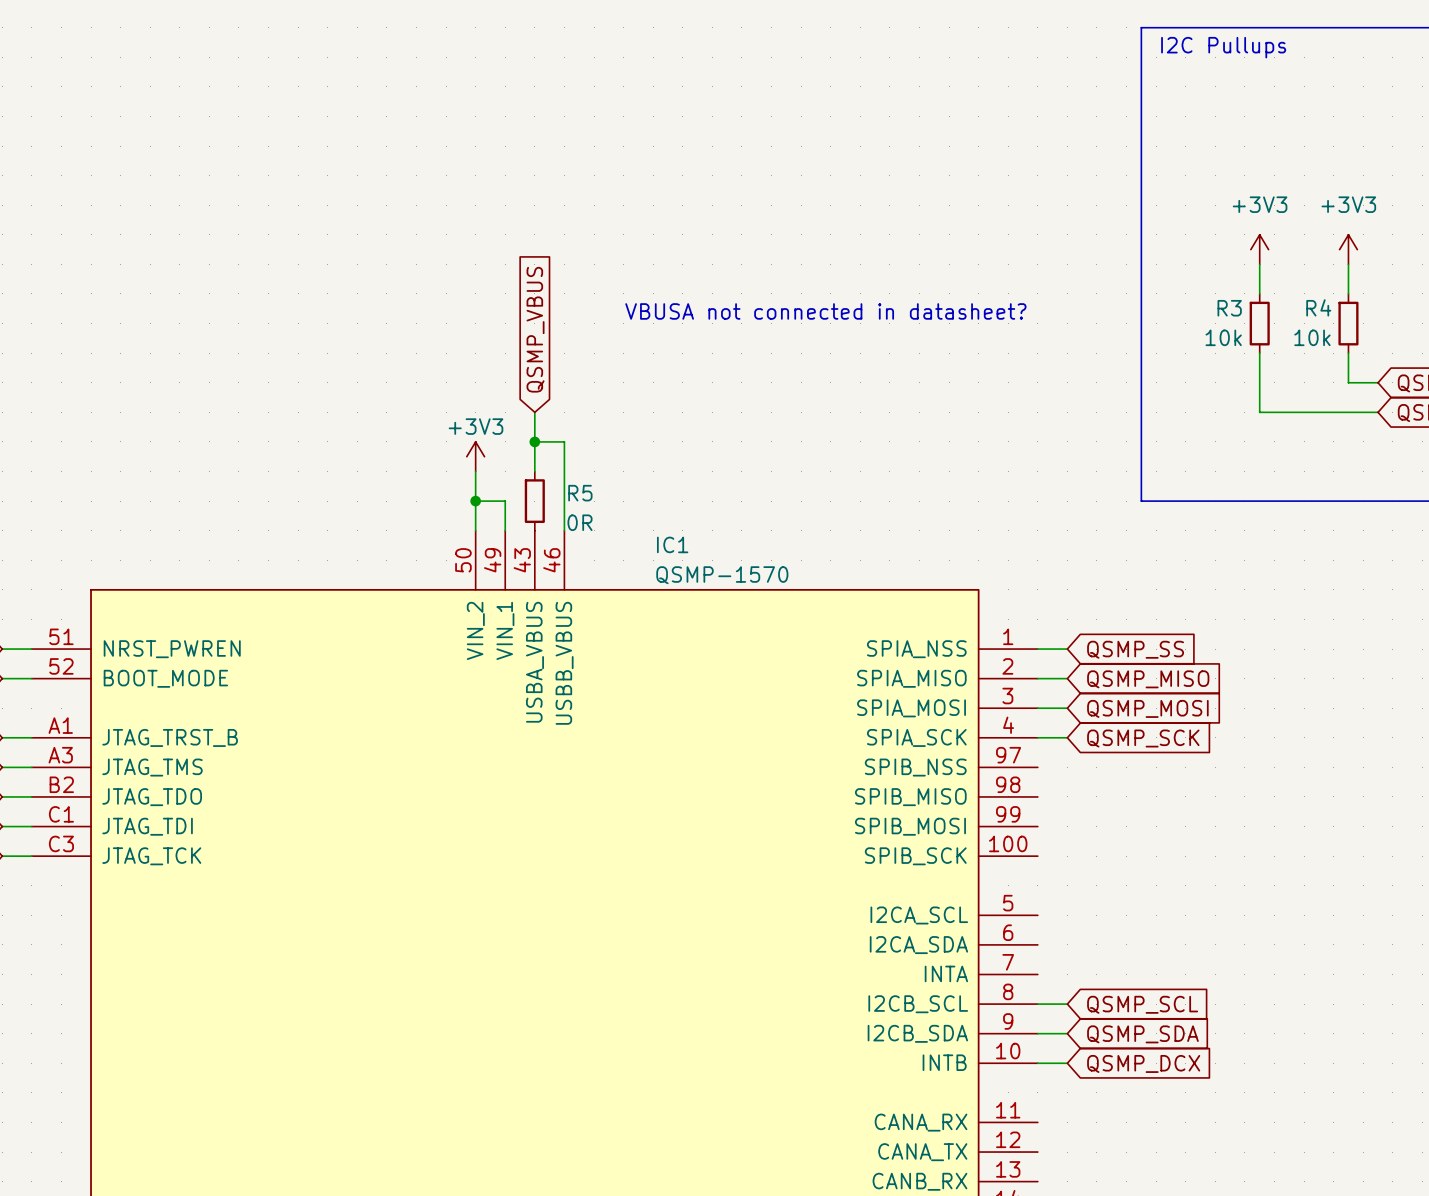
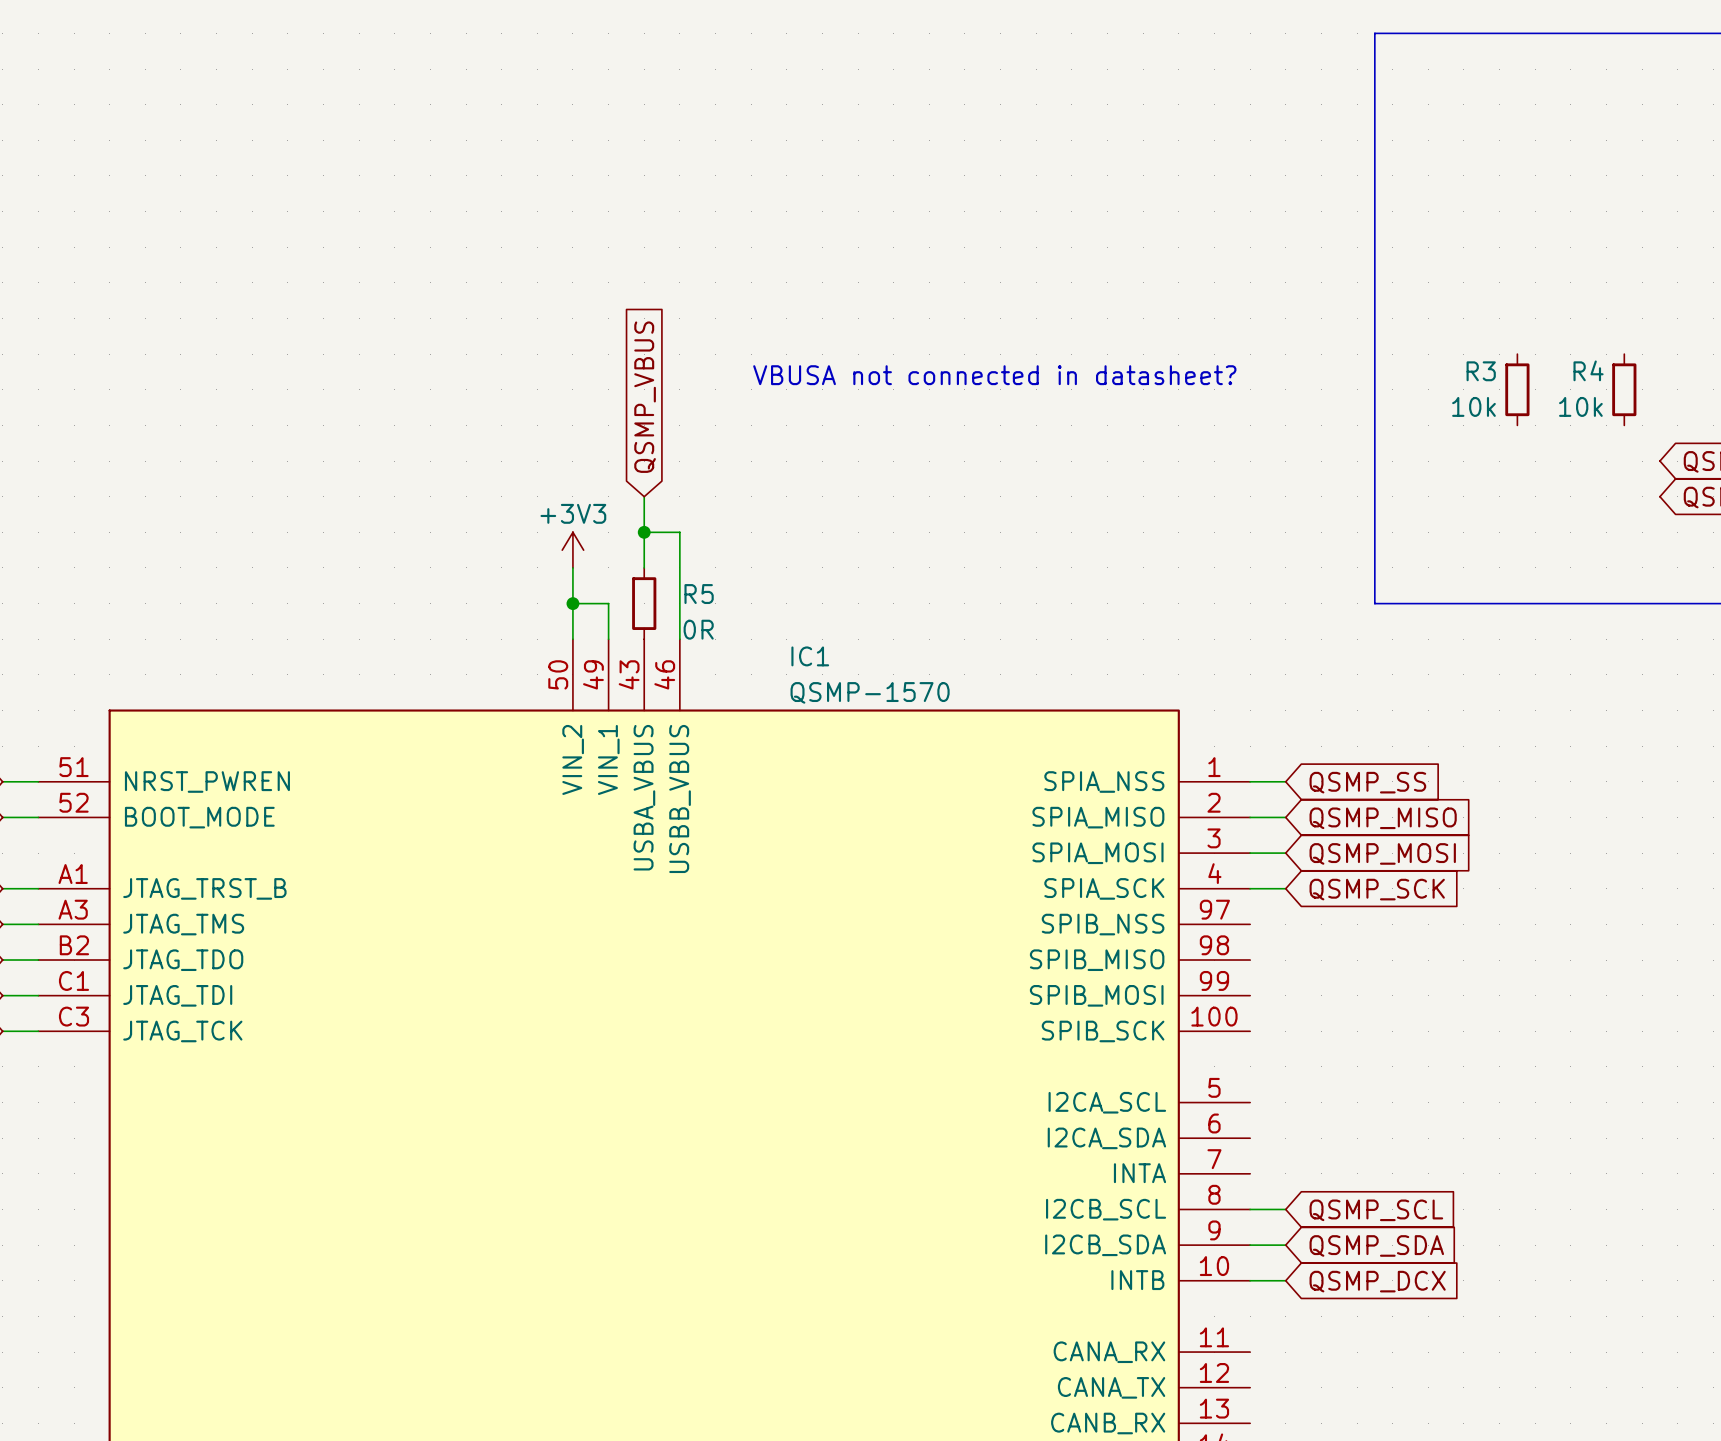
text: I2C Pullups (1223, 47) -> none
power symbol: +3V3 (1259, 249) -> none
power symbol: +3V3 (1348, 249) -> none
wire: (1259, 264) (1259, 293) -> none
wire: (1348, 264) (1348, 293) -> none
wire: (1259, 353) (1259, 412) (1378, 412) -> none
wire: (1348, 353) (1348, 382) (1378, 382) -> none

